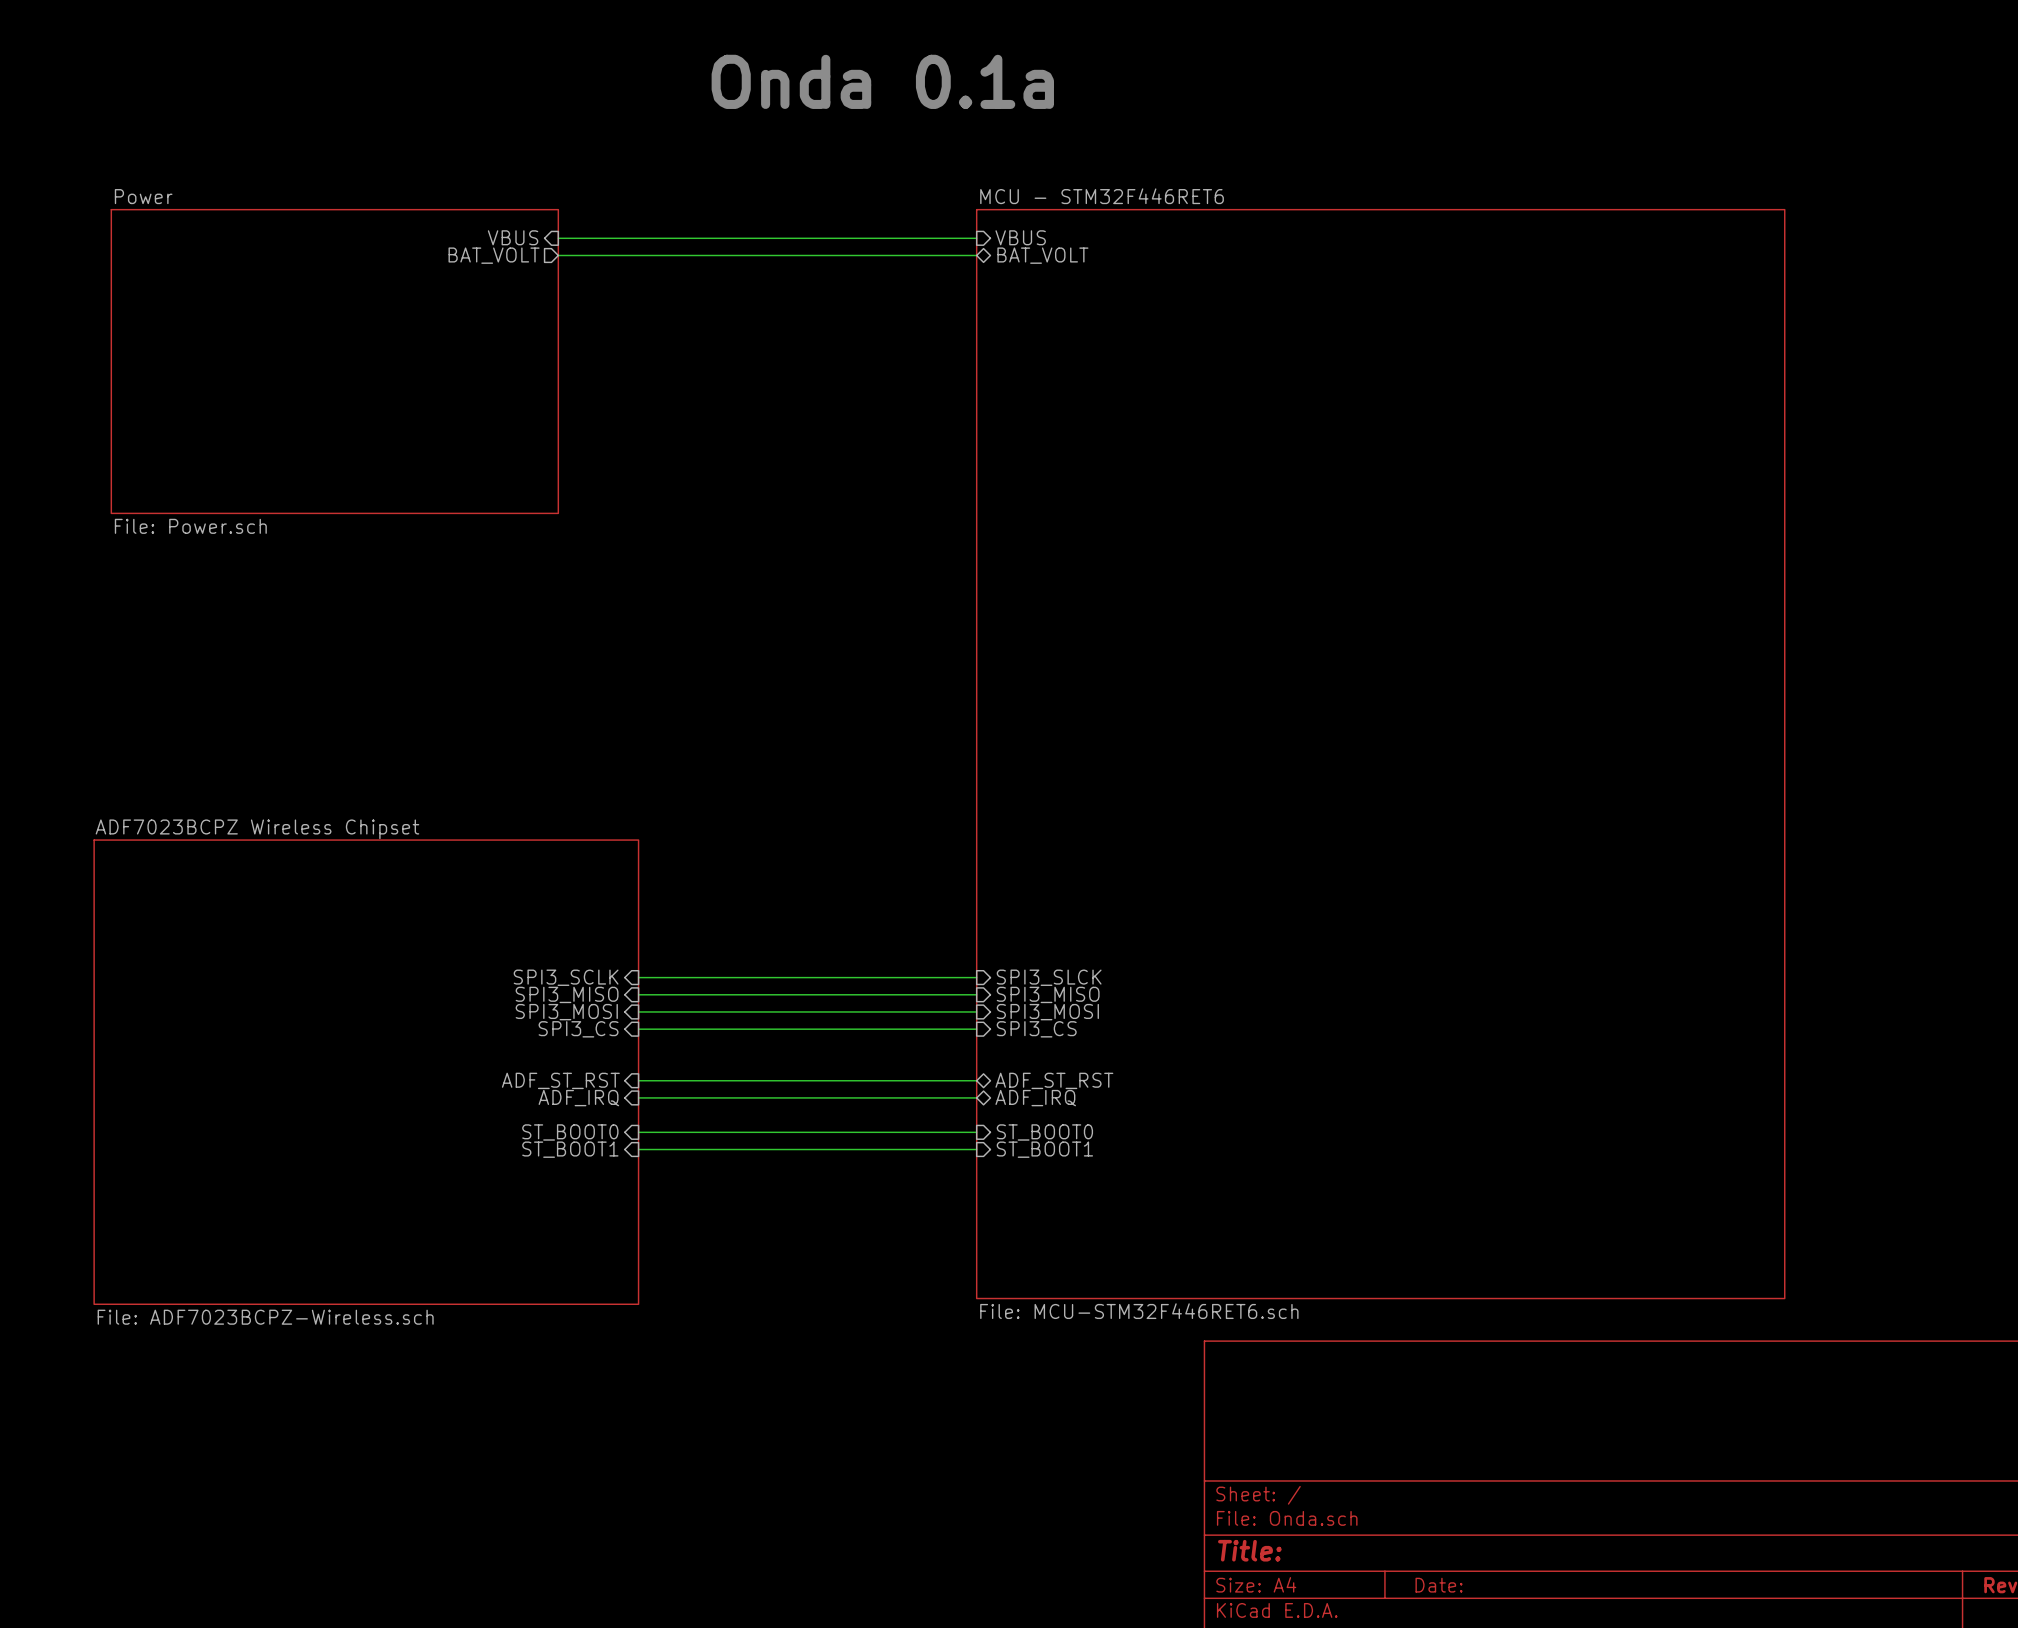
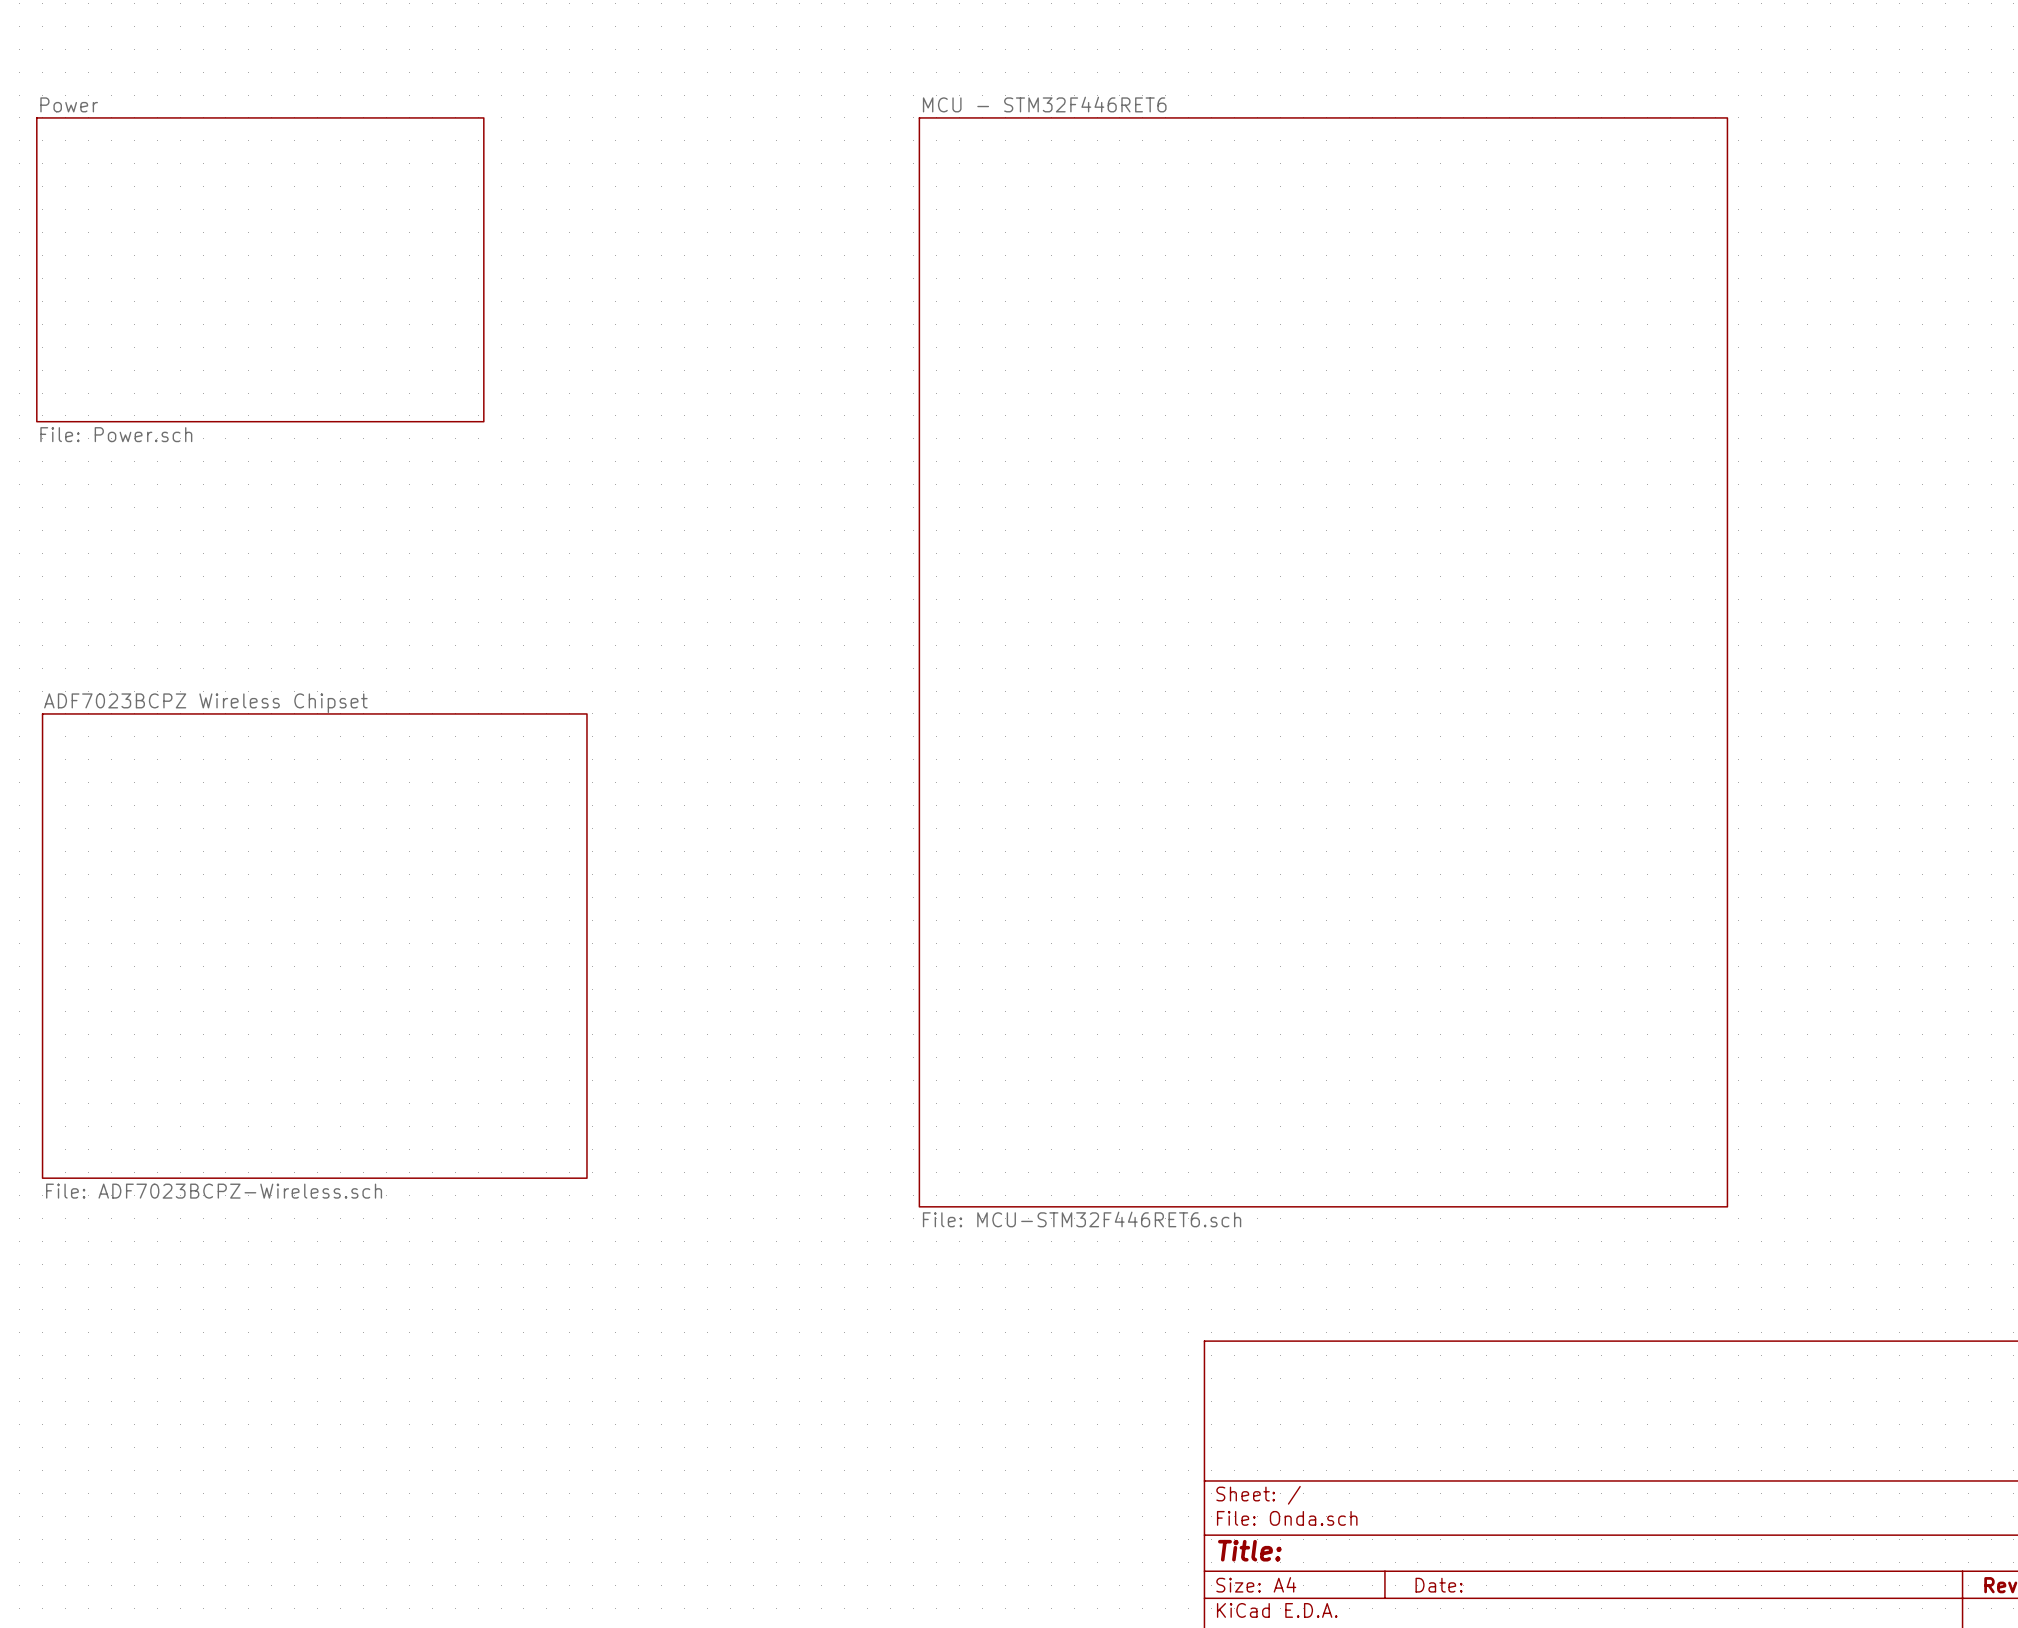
text: Onda 0.1a (882, 81) -> none
sheet pin: VBUS (513, 237) -> none
sheet pin: VBUS (1020, 237) -> none
wire: (558, 238) (976, 238) -> none
sheet pin: BAT_VOLT (494, 255) -> none
wire: (558, 255) (976, 255) -> none
sheet pin: BAT_VOLT (1042, 255) -> none
sheet Power position: (334, 361) -> (260, 269)
sheet MCU - STM32F446RET6 position: (1380, 754) -> (1323, 662)
sheet pin: SPI3_SCLK (566, 977) -> none
wire: (638, 977) (976, 977) -> none
sheet pin: SPI3_SLCK (1049, 977) -> none
sheet pin: SPI3_MISO (567, 994) -> none
wire: (638, 994) (976, 994) -> none
sheet pin: SPI3_MISO (1048, 994) -> none
wire: (638, 1011) (976, 1011) -> none
sheet pin: SPI3_MOSI (566, 1012) -> none
sheet pin: SPI3_MOSI (1047, 1012) -> none
sheet pin: SPI3_CS (578, 1029) -> none
wire: (638, 1029) (976, 1029) -> none
sheet pin: SPI3_CS (1036, 1029) -> none
sheet ADF7023BCPZ Wireless Chipset position: (366, 1072) -> (314, 946)
sheet pin: ADF_ST_RST (560, 1080) -> none
wire: (638, 1080) (976, 1080) -> none
sheet pin: ADF_ST_RST (1054, 1080) -> none
wire: (638, 1097) (976, 1097) -> none
sheet pin: ADF_IRQ (578, 1098) -> none
sheet pin: ADF_IRQ (1035, 1098) -> none
sheet pin: ST_BOOT0 (570, 1132) -> none
wire: (638, 1132) (976, 1132) -> none
sheet pin: ST_BOOT0 (1044, 1132) -> none
sheet pin: ST_BOOT1 (570, 1149) -> none
wire: (638, 1149) (976, 1149) -> none
sheet pin: ST_BOOT1 (1044, 1149) -> none

